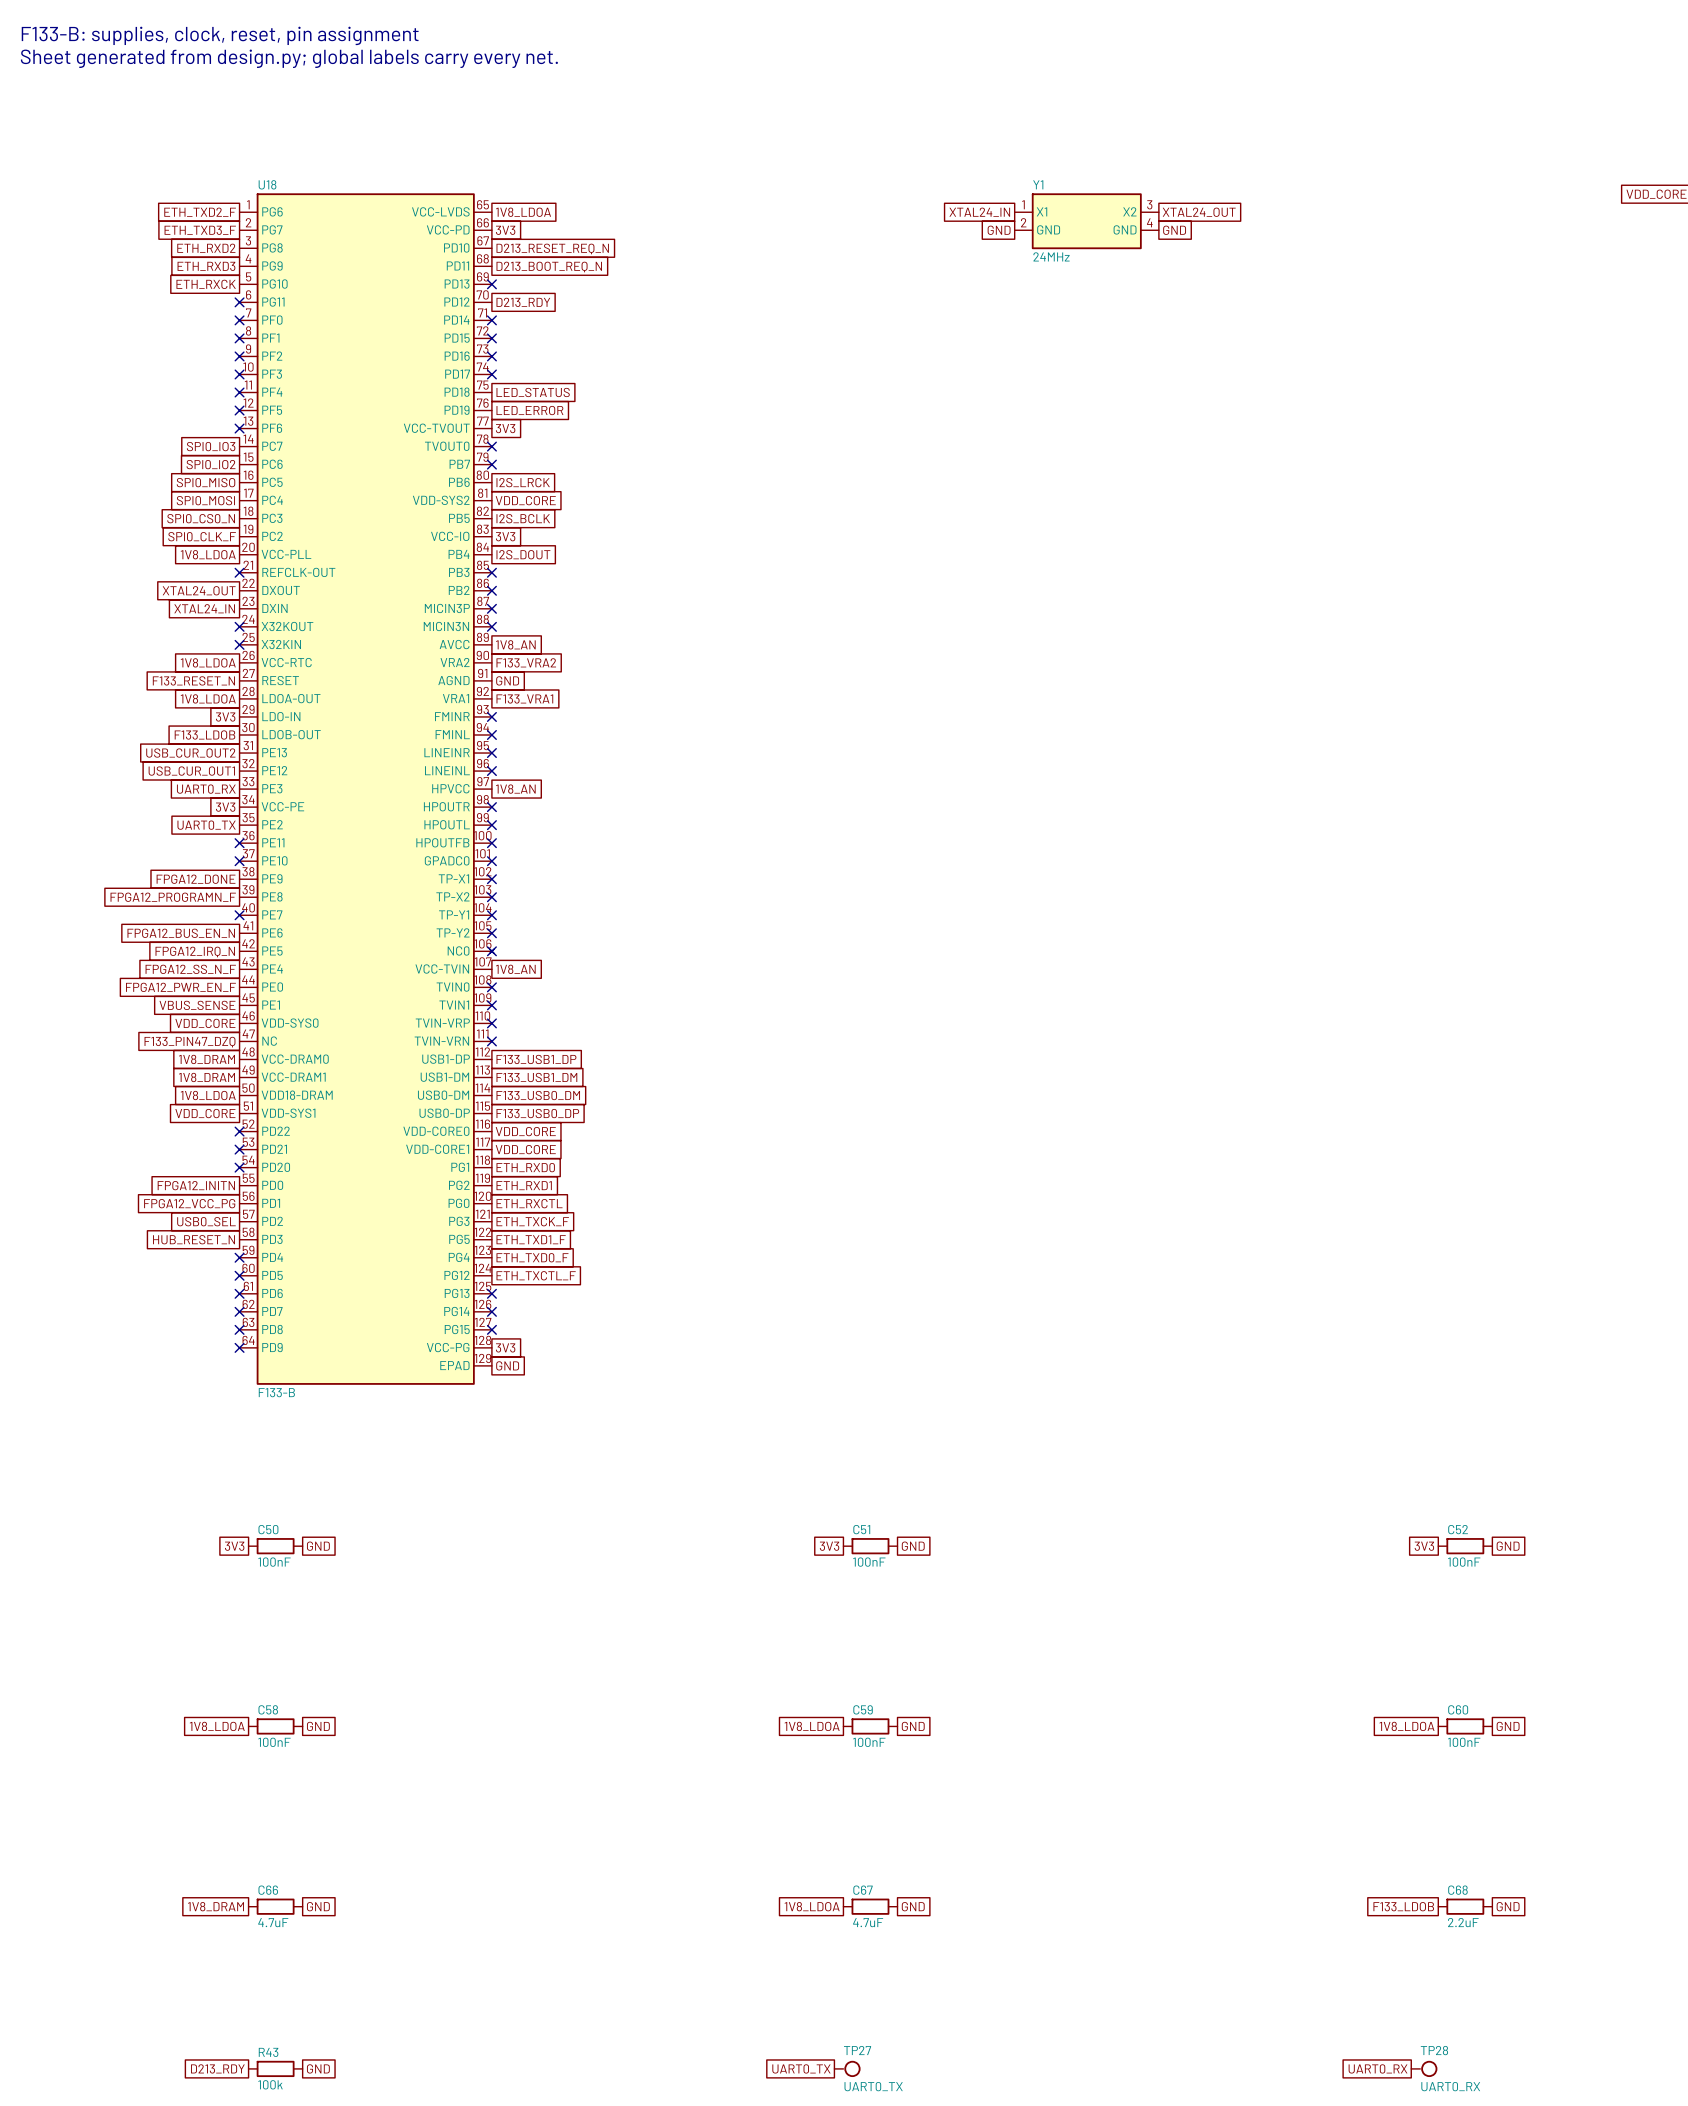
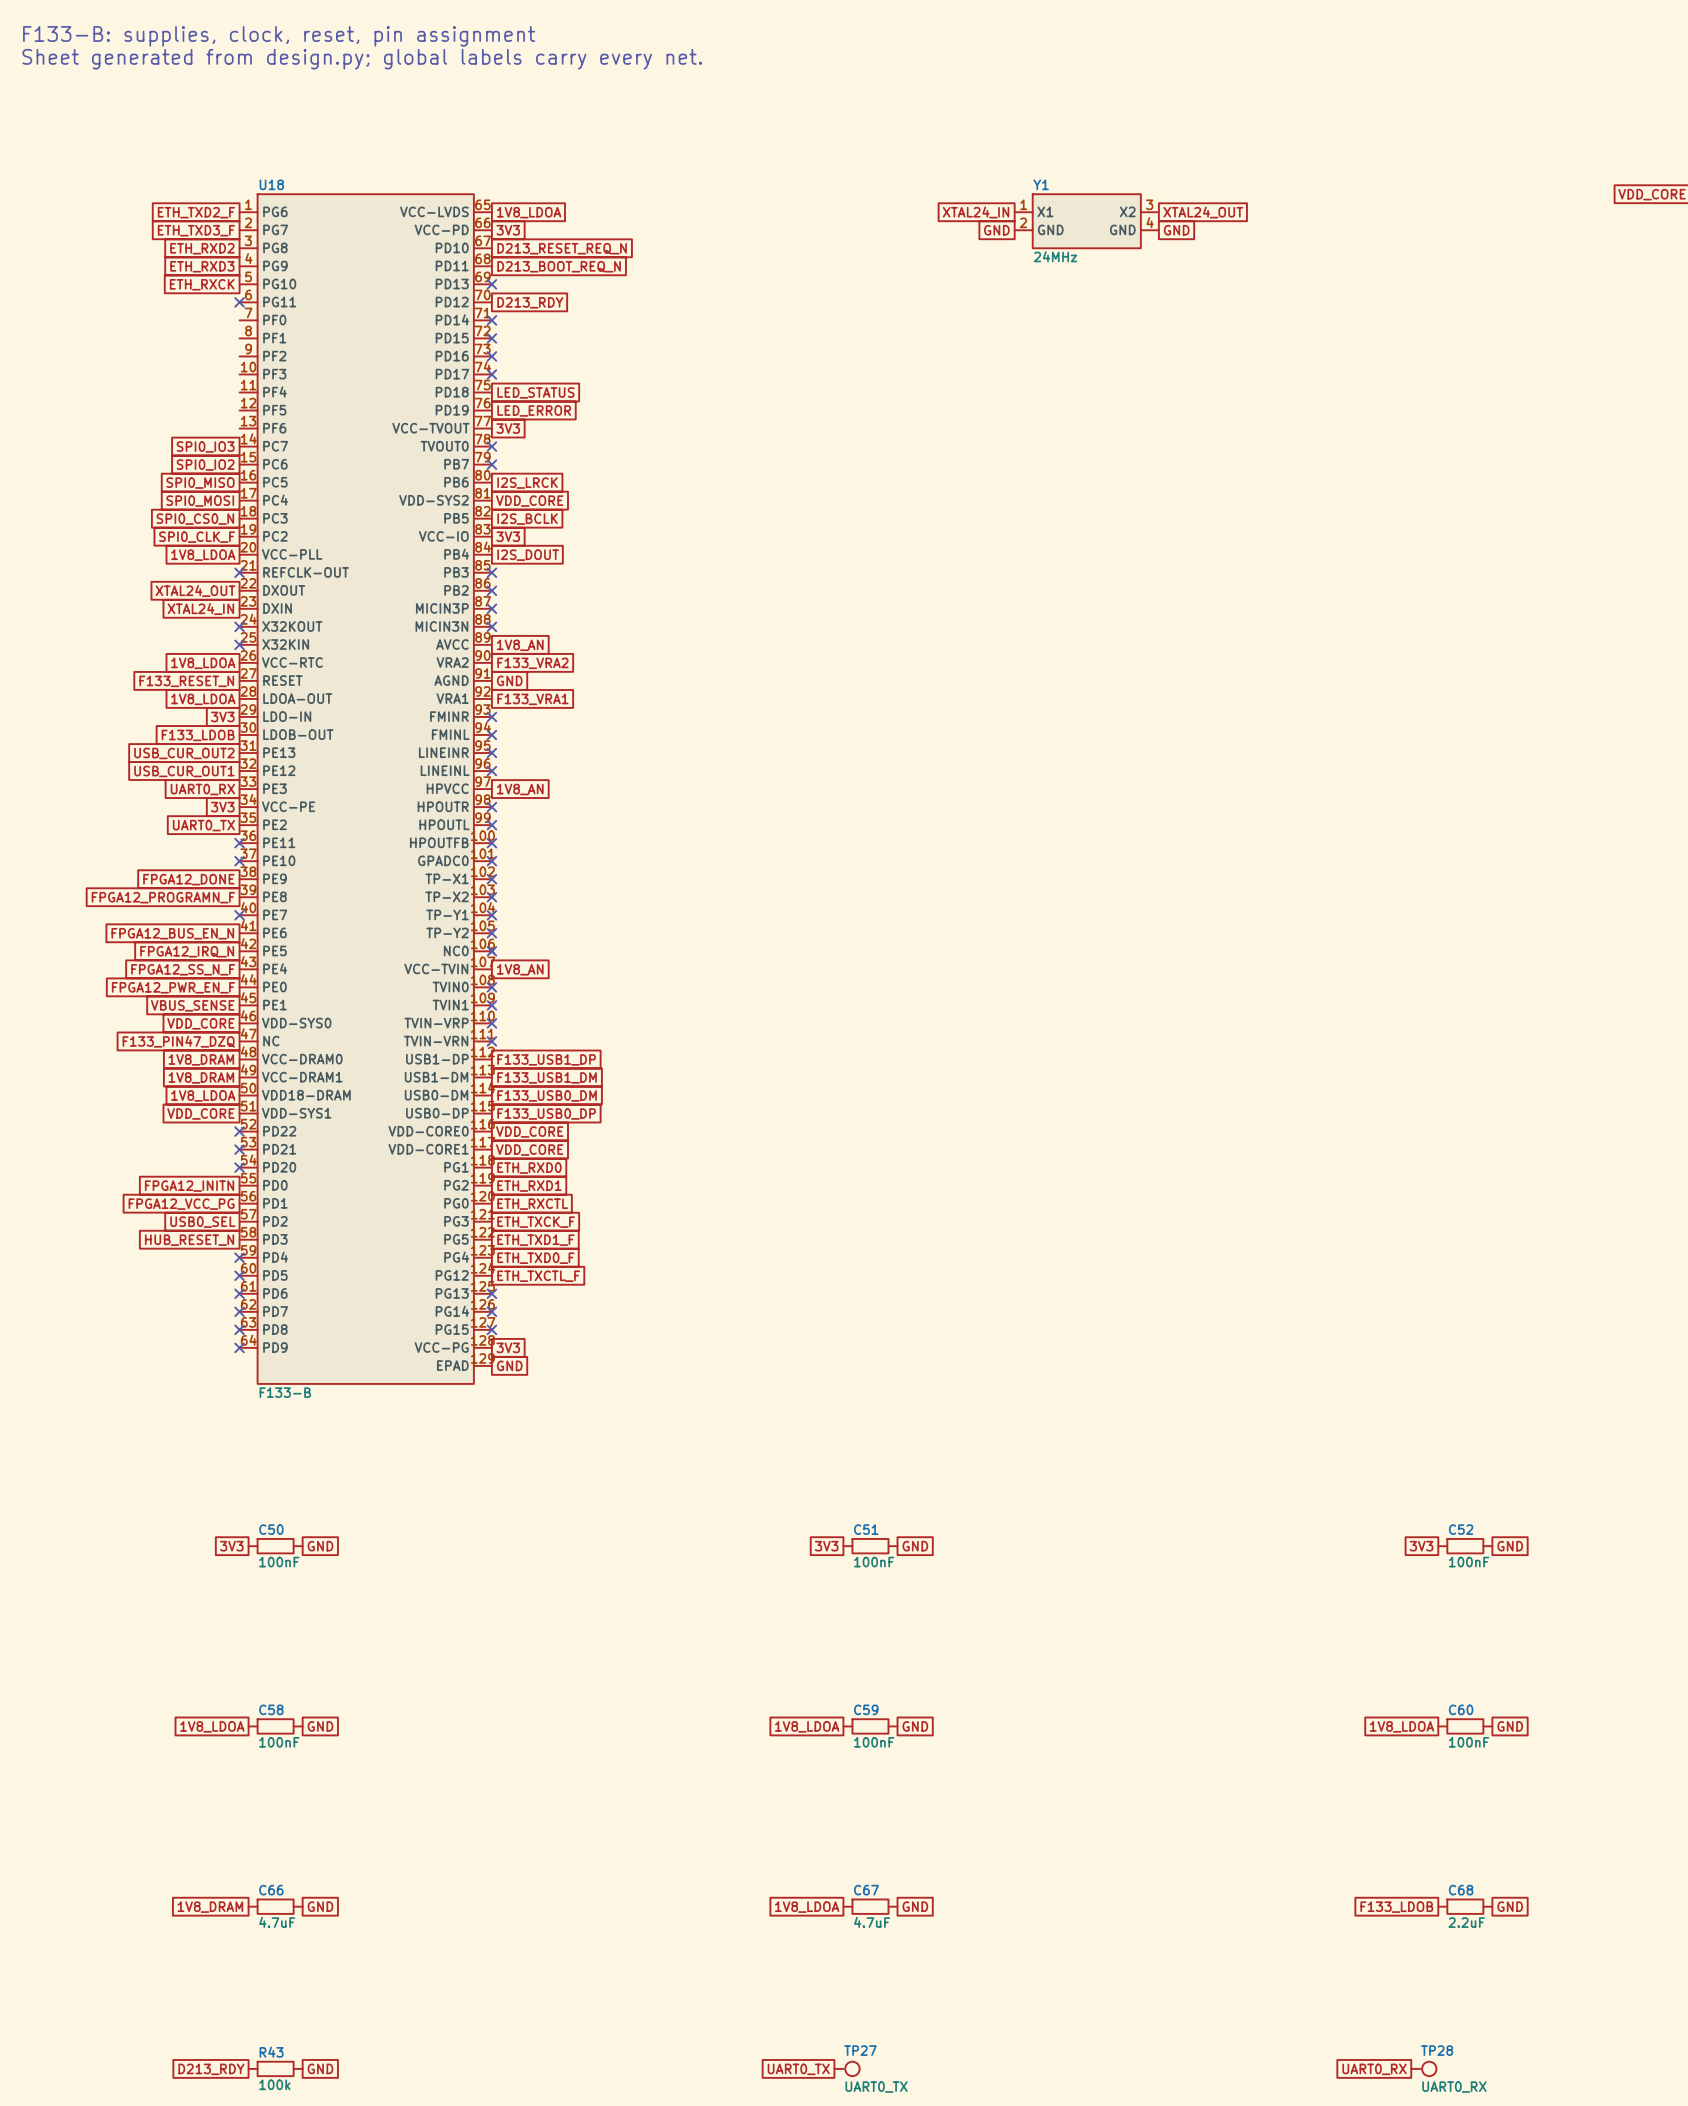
no-connect mark: (239, 320) -> none
no-connect mark: (239, 338) -> none
no-connect mark: (239, 356) -> none
no-connect mark: (239, 374) -> none
no-connect mark: (239, 392) -> none
no-connect mark: (239, 410) -> none
no-connect mark: (239, 428) -> none

